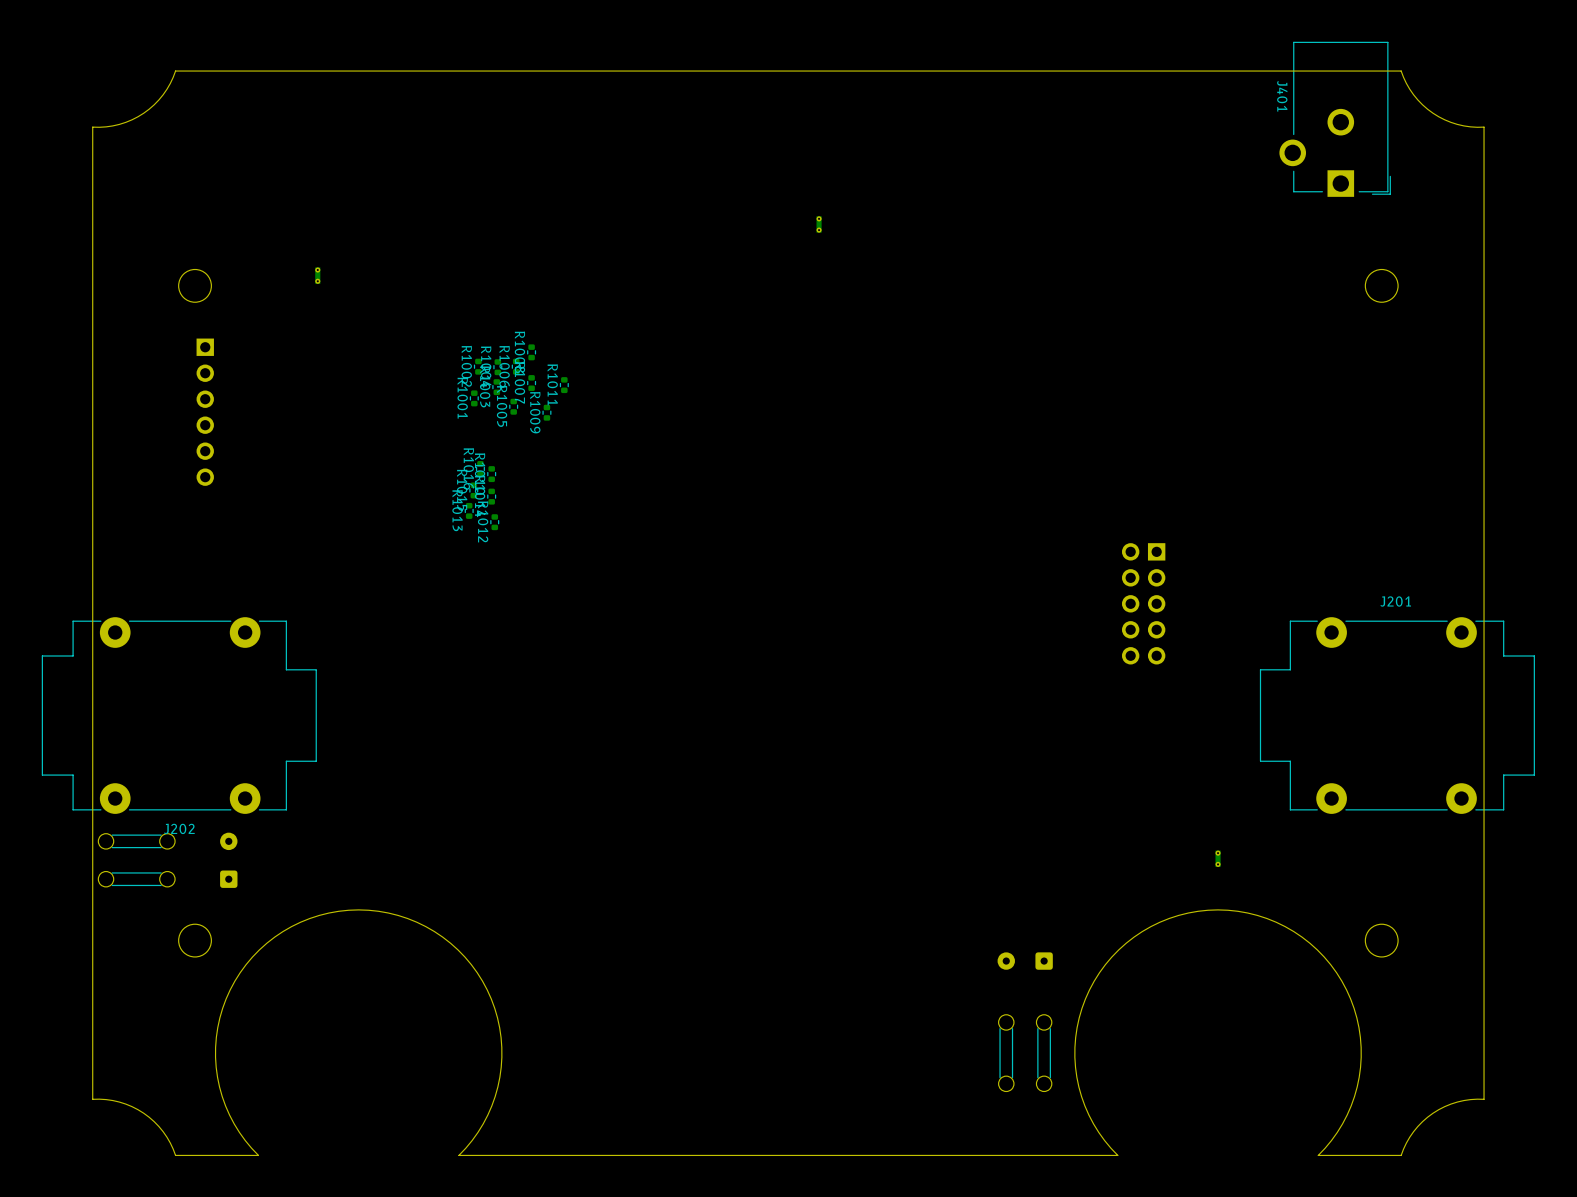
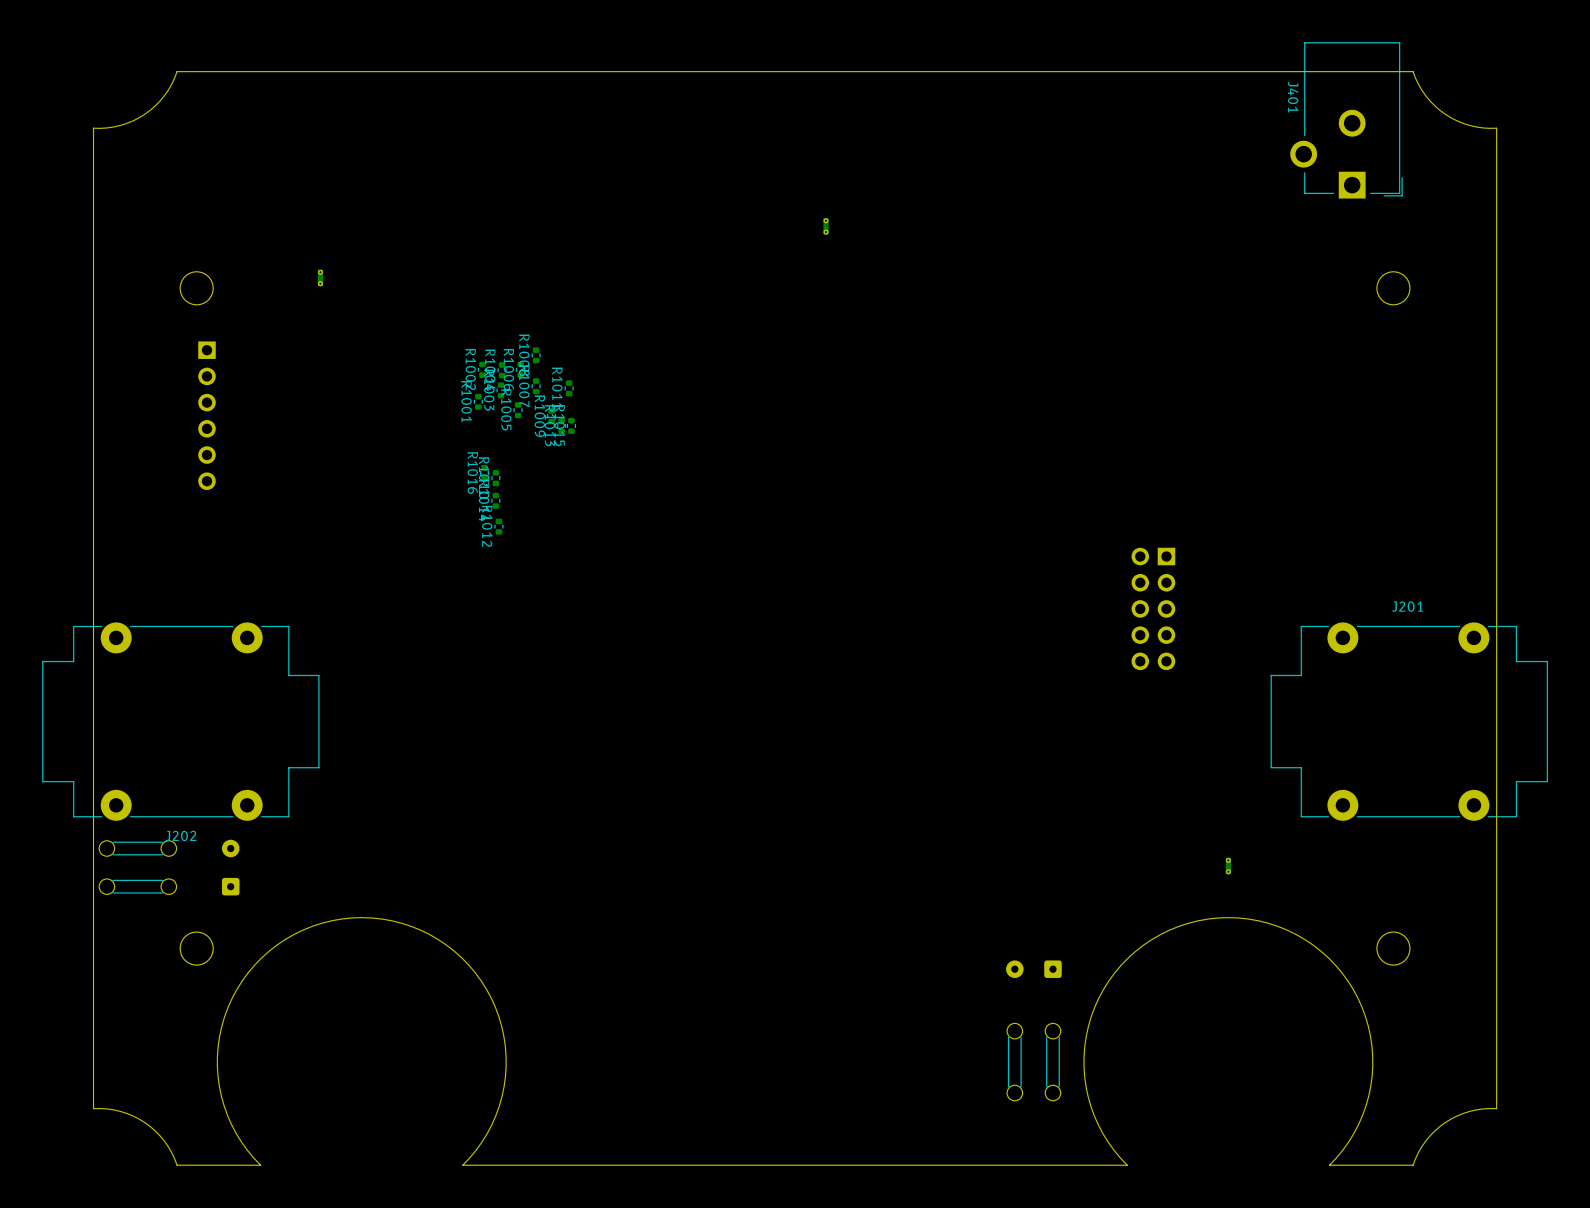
R1015 position: (473, 490) -> (571, 425)
R1013 position: (469, 510) -> (561, 425)

